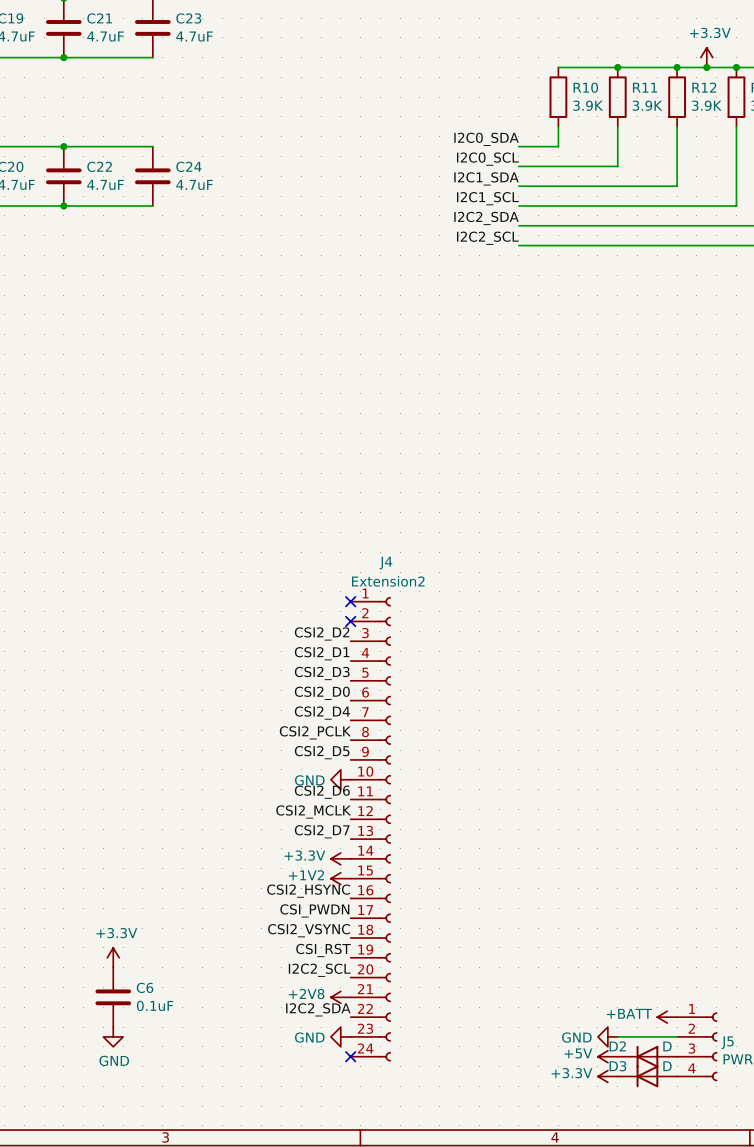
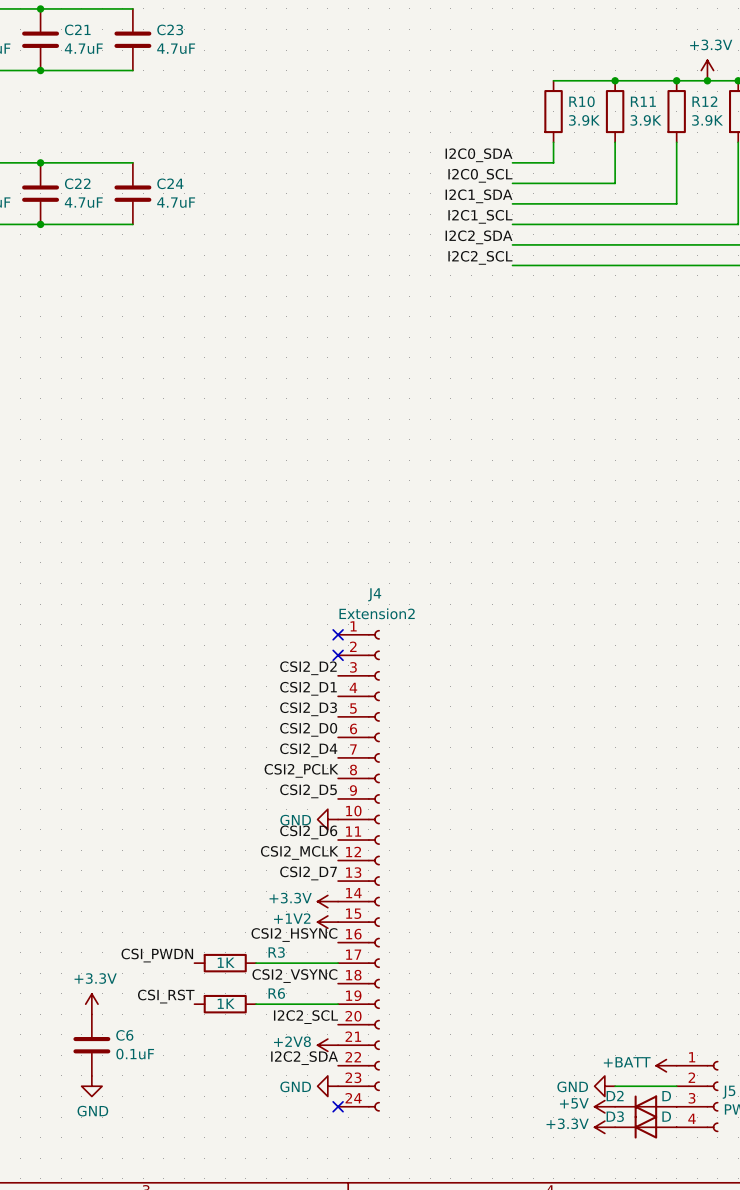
label position: CSI_PWDN (314, 910) -> CSI_PWDN (157, 955)
R3: none -> 1K (225, 963)
wire: none -> (256, 963) (338, 963)
label position: CSI_RST (323, 950) -> CSI_RST (166, 996)
R6: none -> 1K (225, 1004)
wire: none -> (256, 1004) (338, 1004)

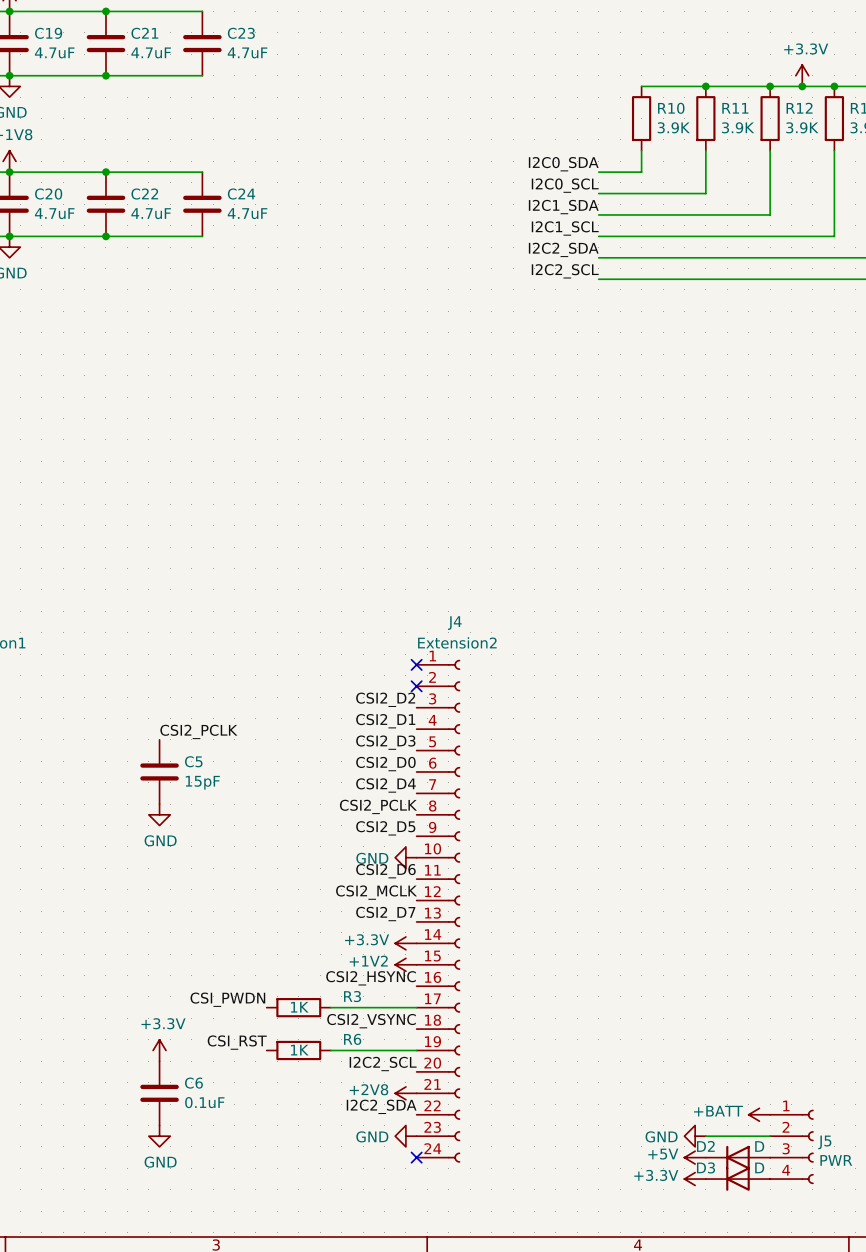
label: none -> CSI2_PCLK (198, 731)
C5: none -> 15pF (159, 771)
power symbol: none -> GND (159, 814)

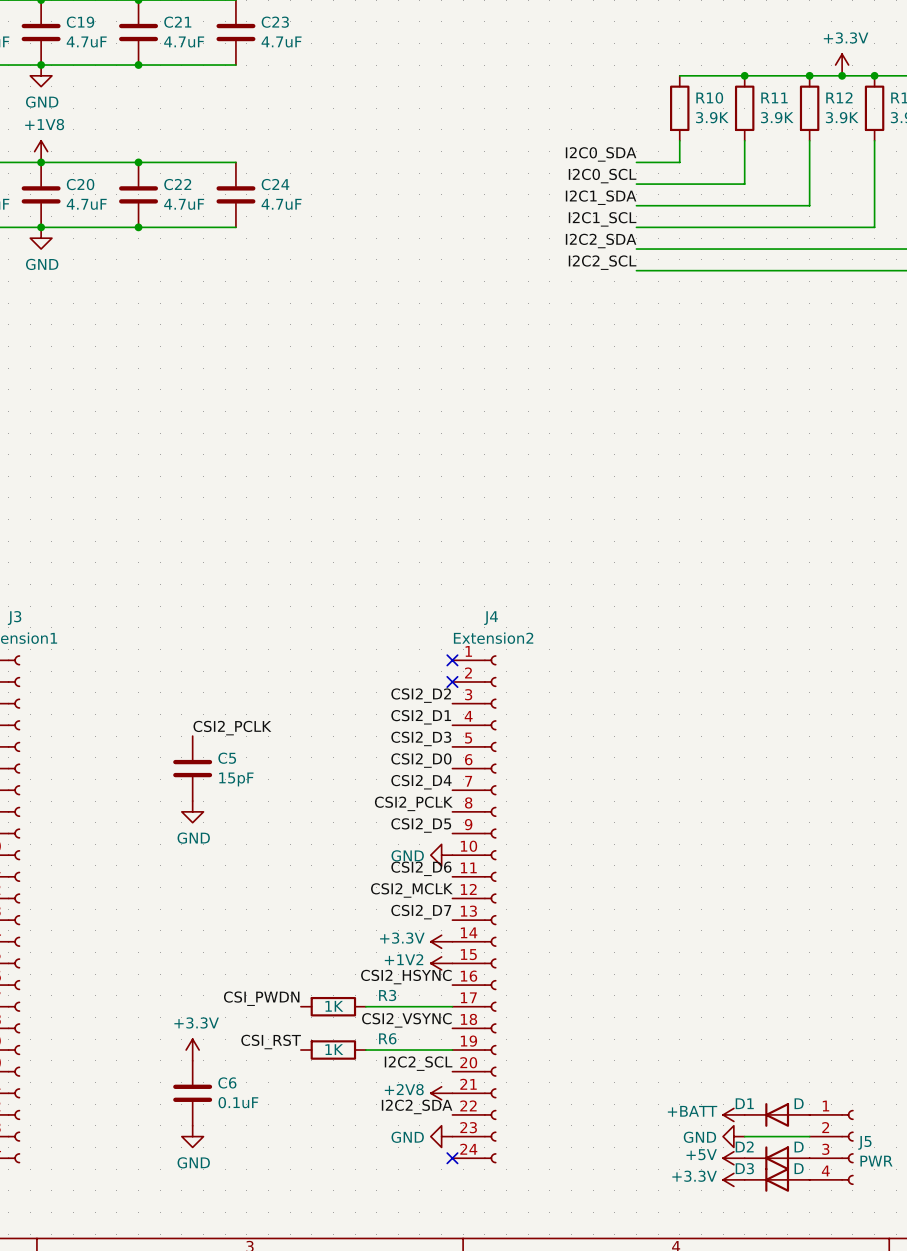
D1: none -> D (777, 1114)
power symbol position: +BATT (759, 1114) -> +BATT (733, 1114)

